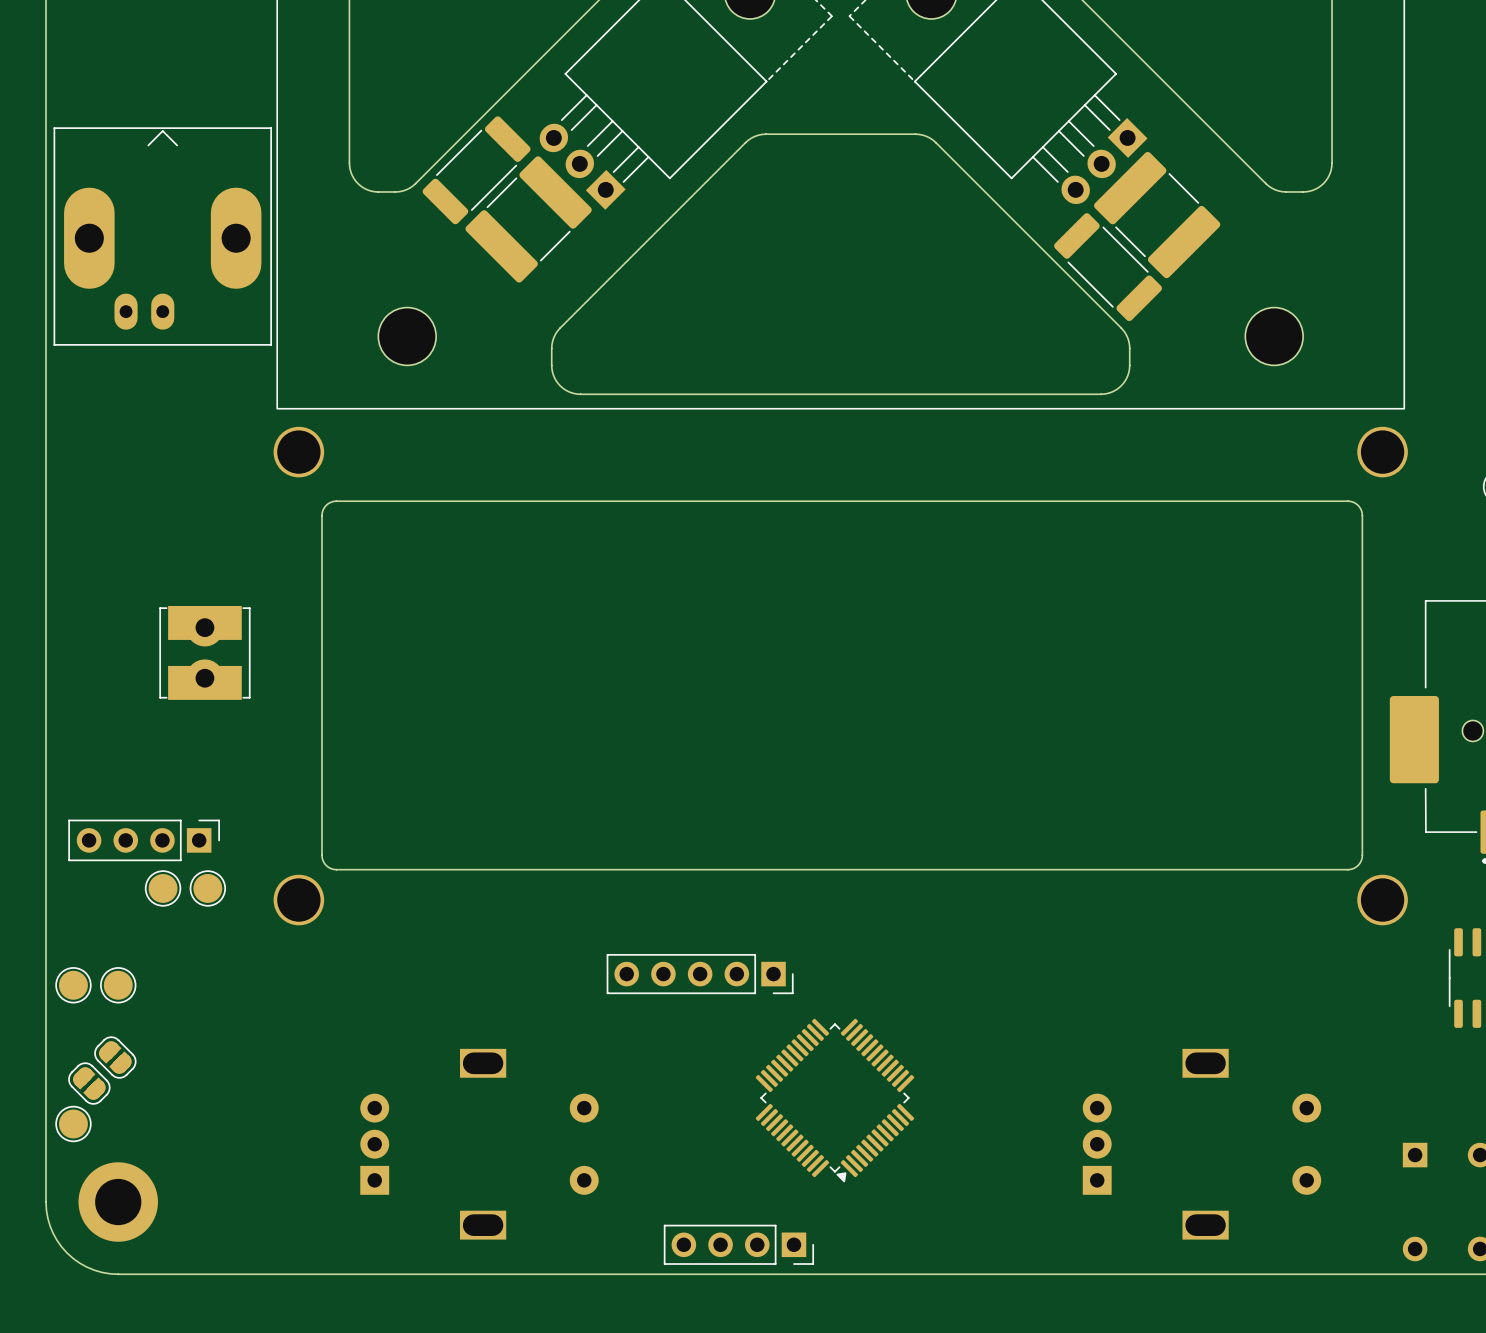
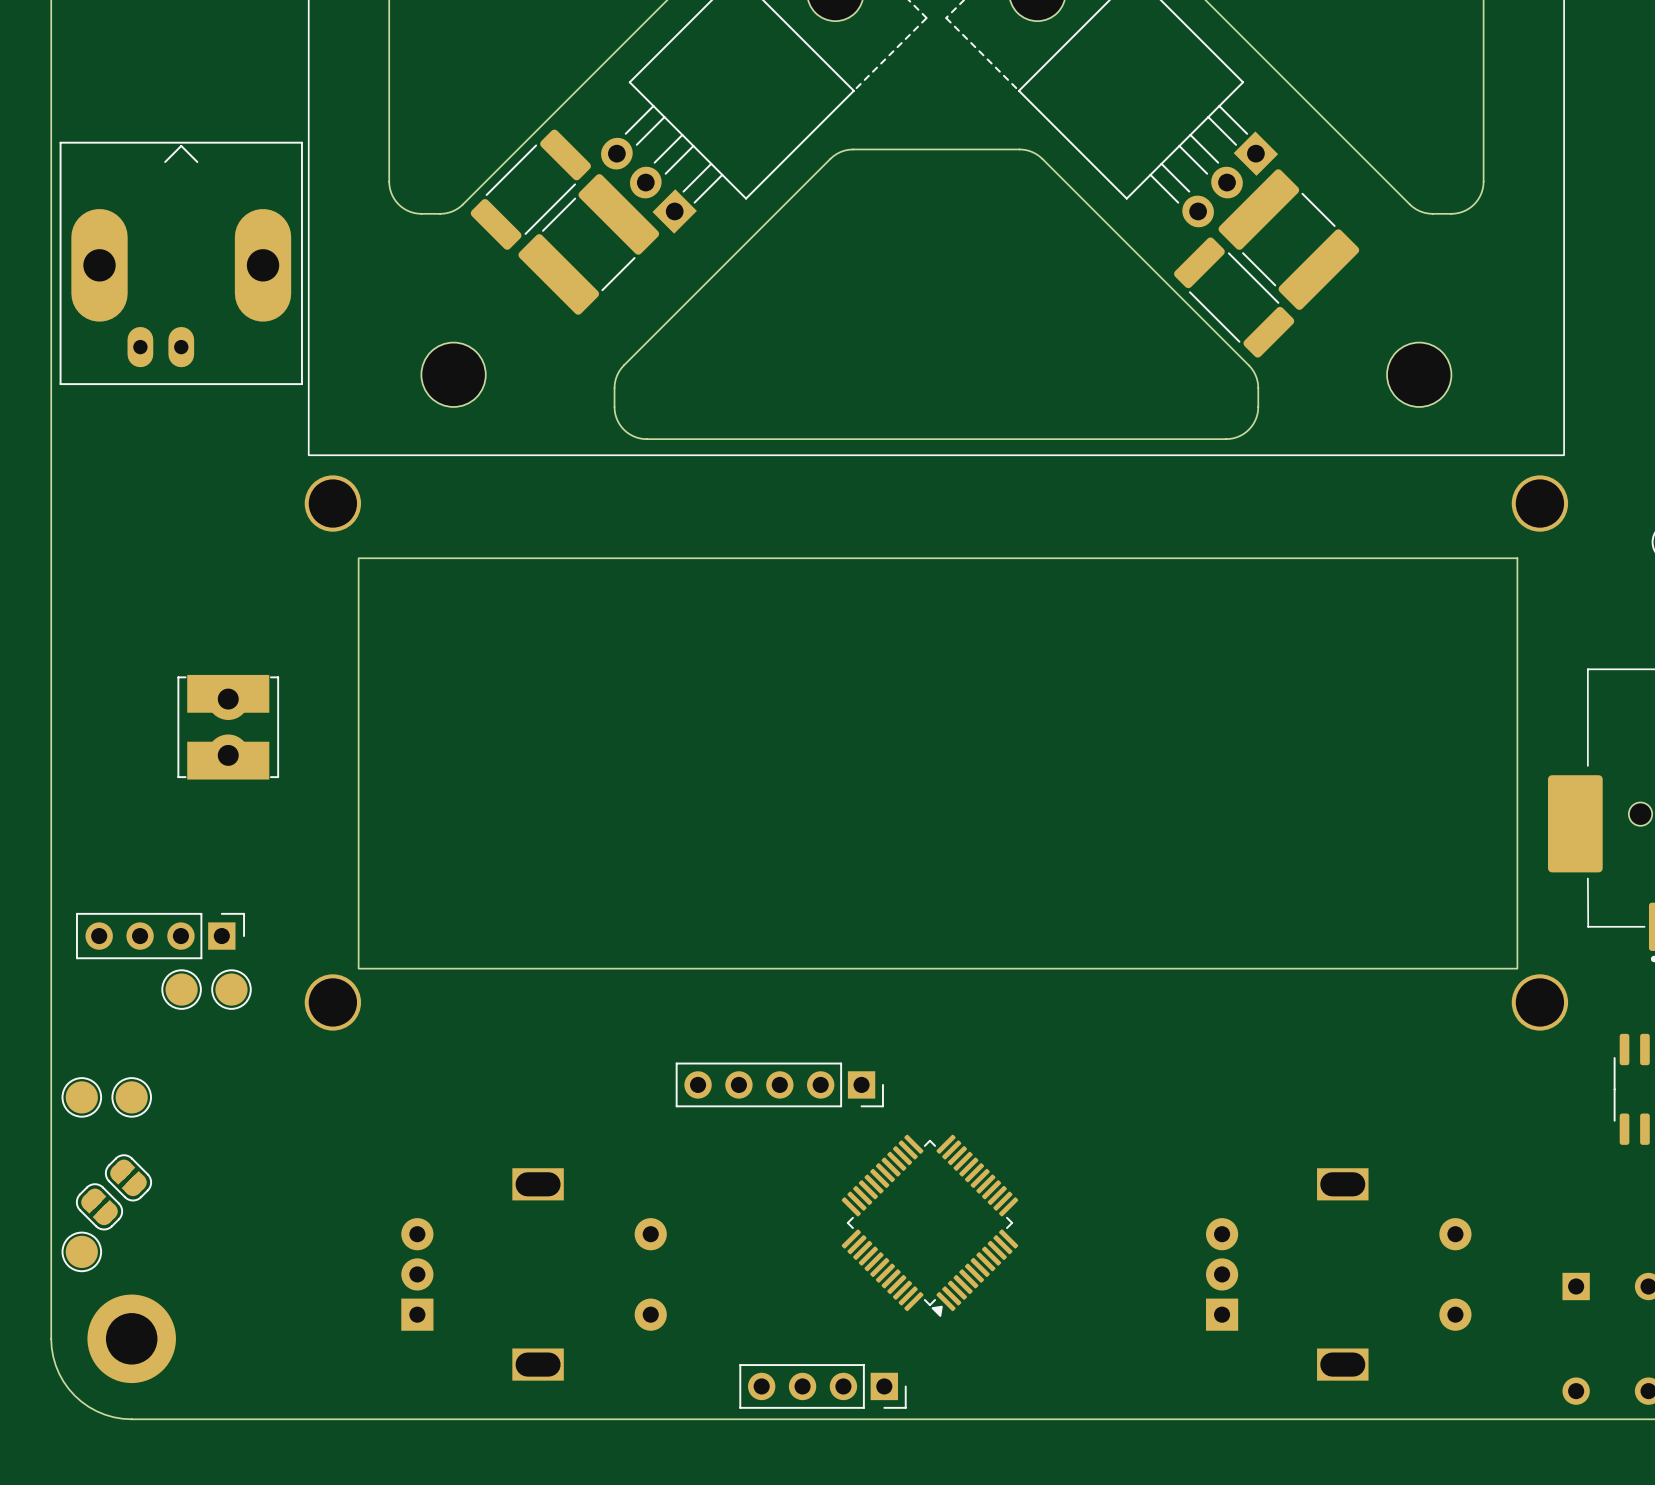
part footprint: [273, 426, 1408, 926] -> [304, 475, 1569, 1031]

